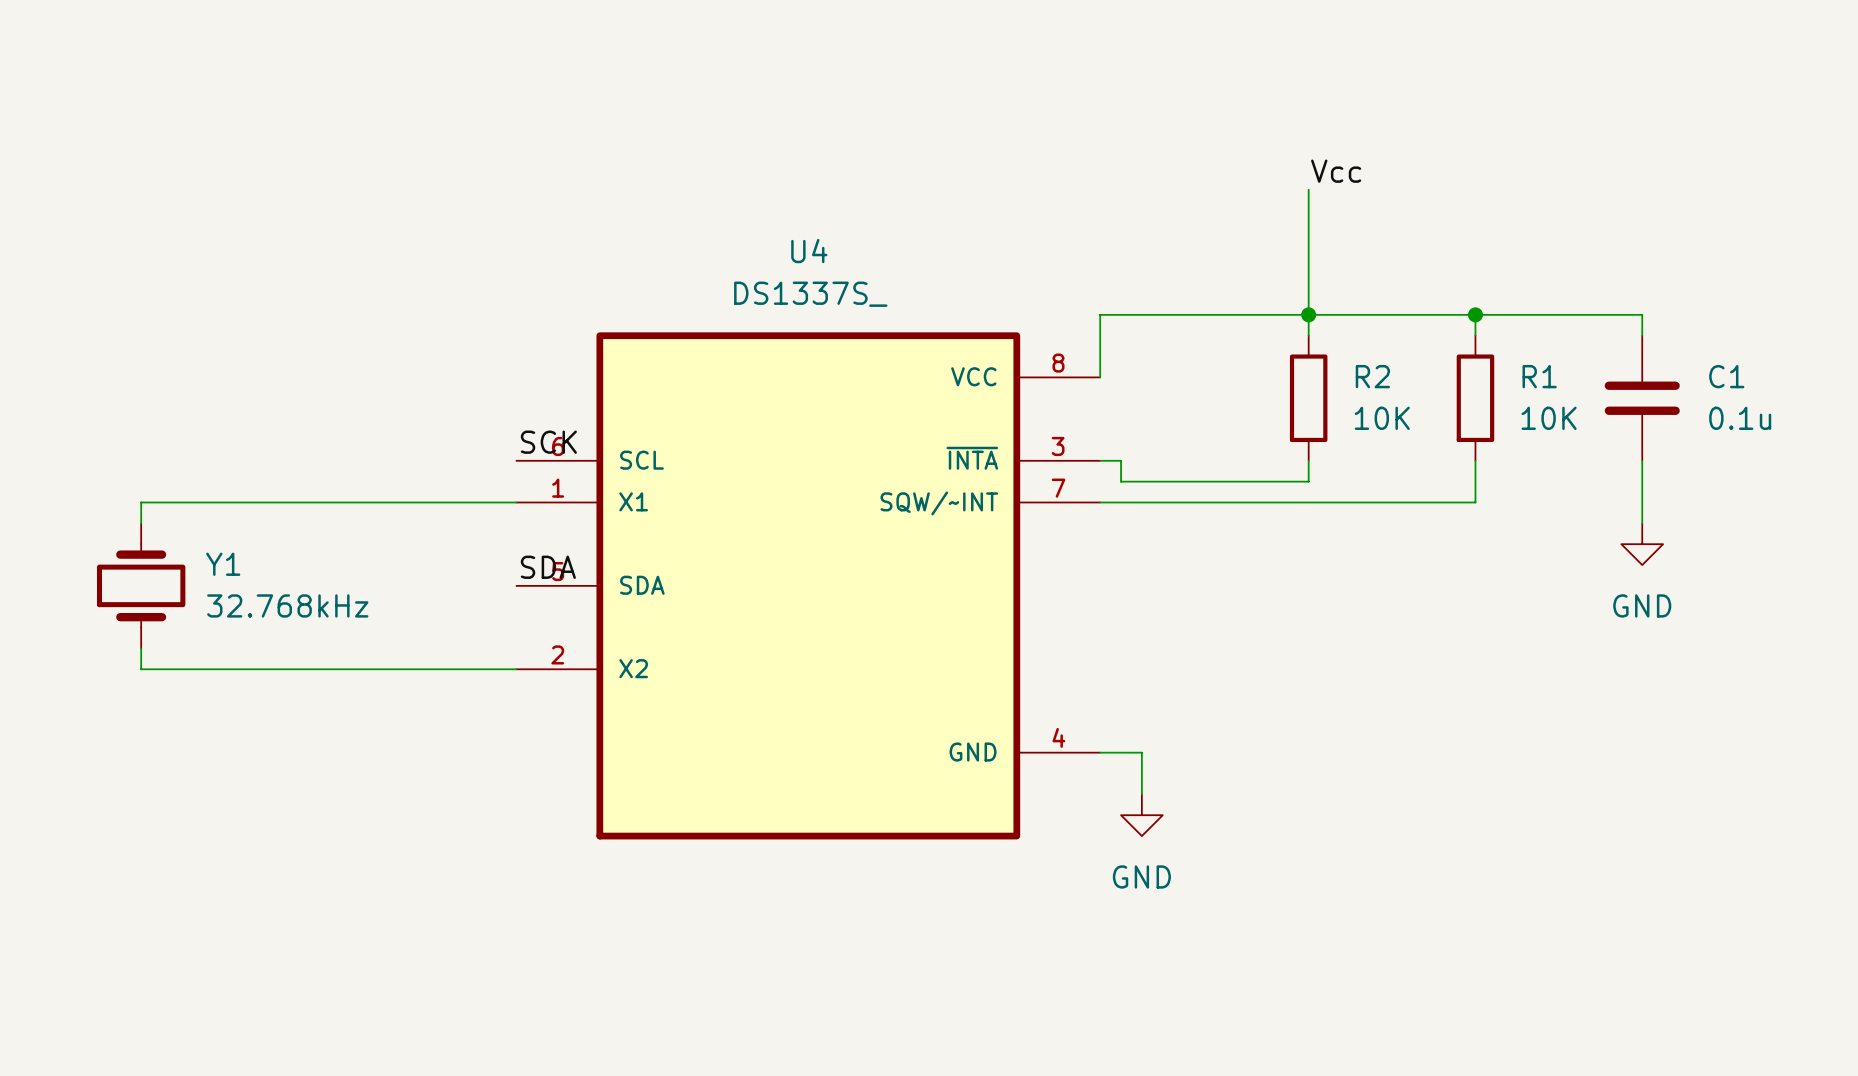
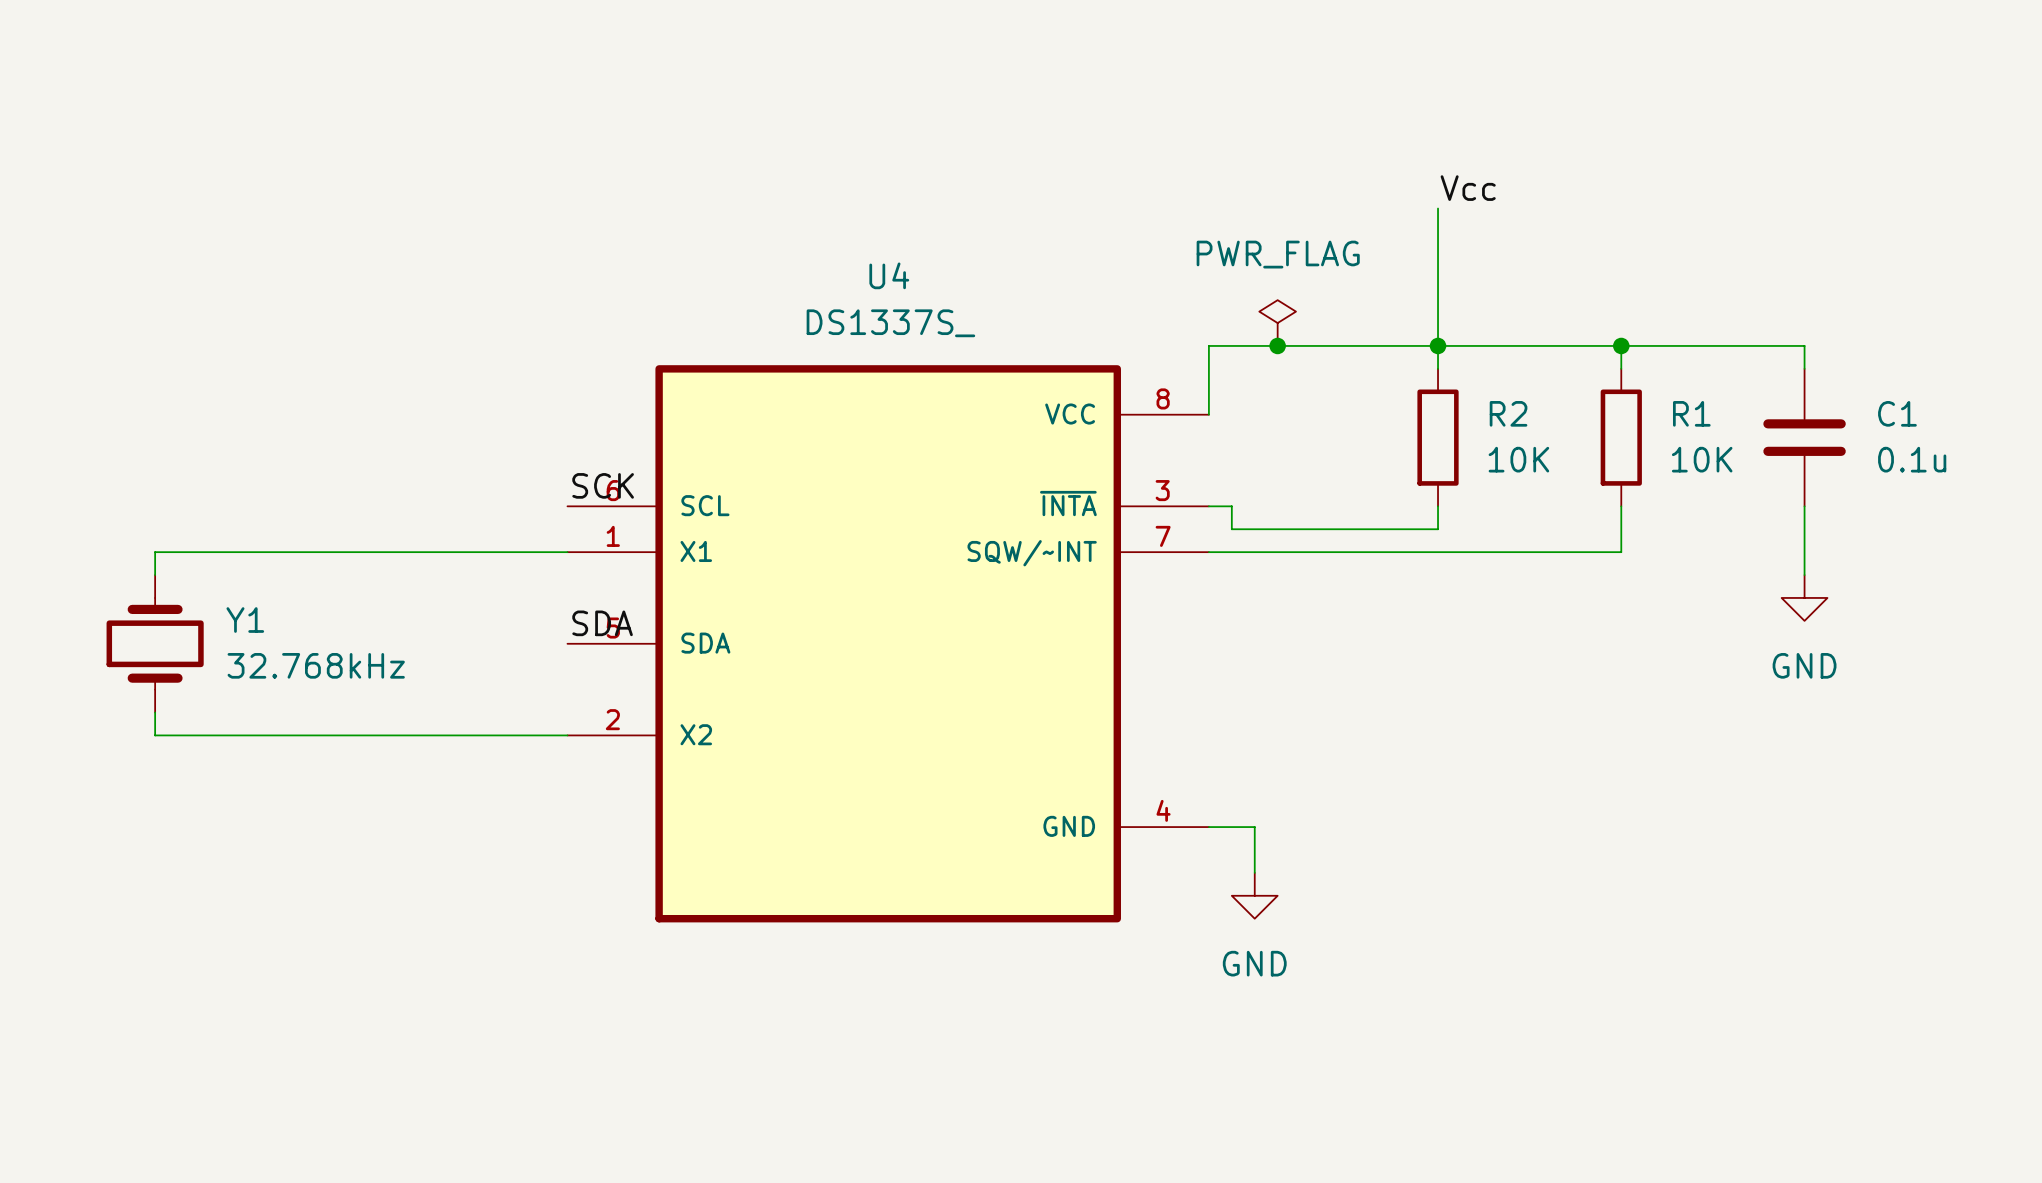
power symbol: none -> PWR_FLAG (1277, 323)
junction: none -> (1277, 345)

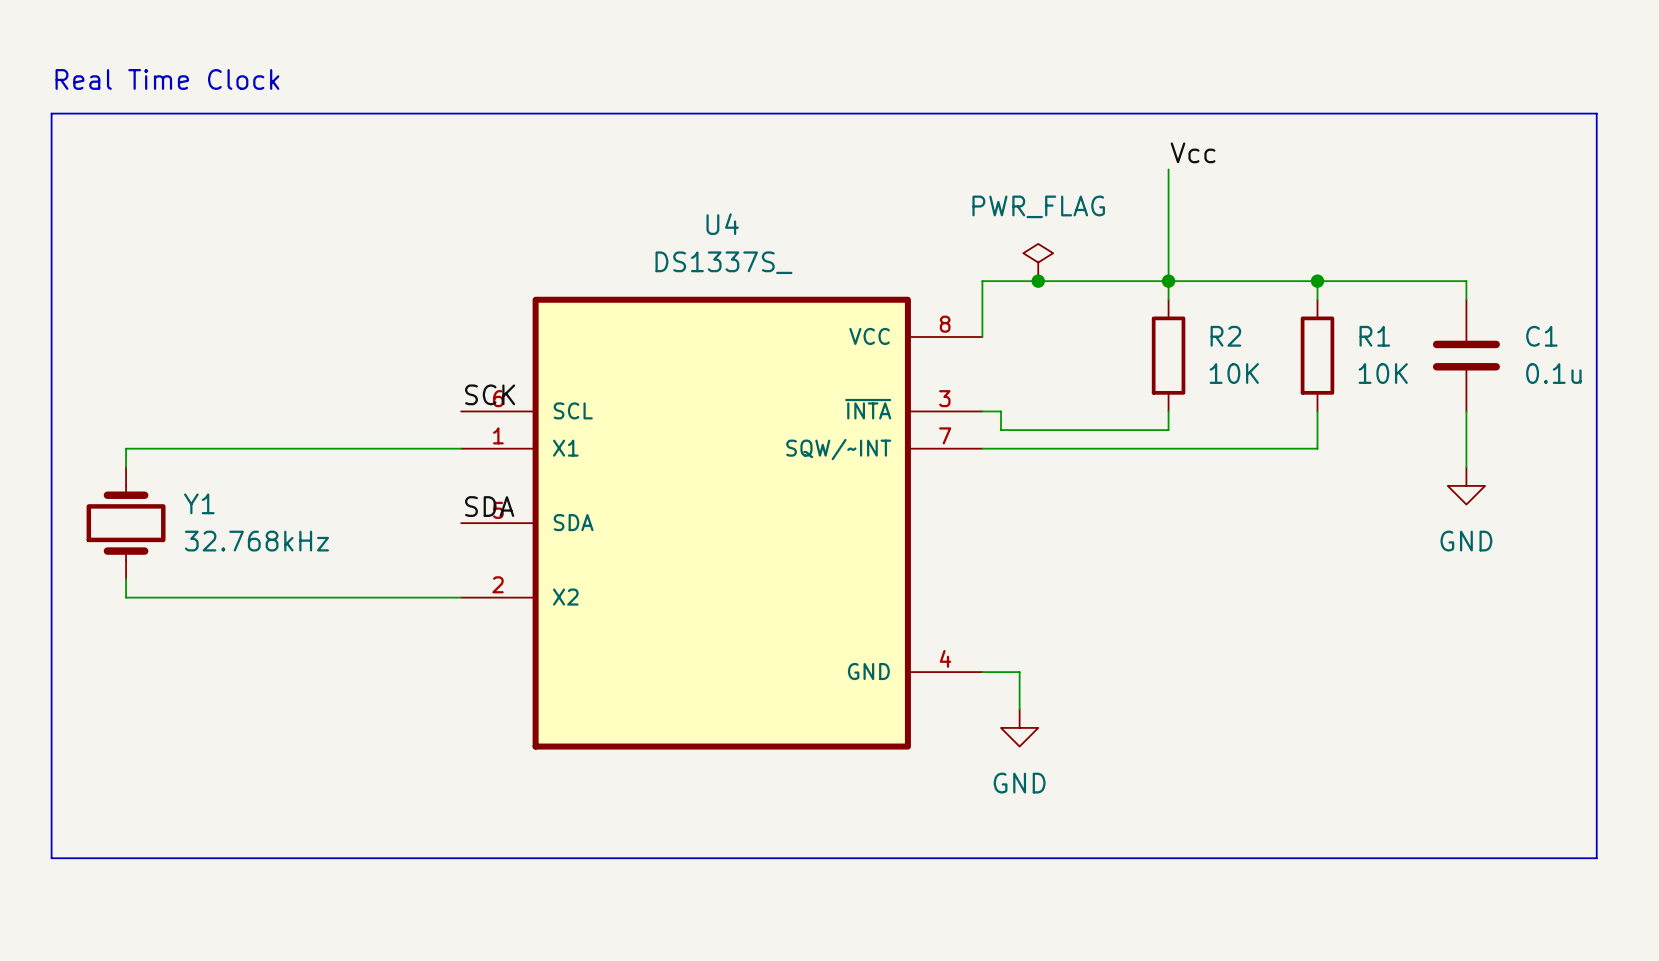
text: none -> Real Time Clock (167, 79)
line: none -> (51, 113) (1596, 113) (1596, 858) (51, 858) (51, 113)

